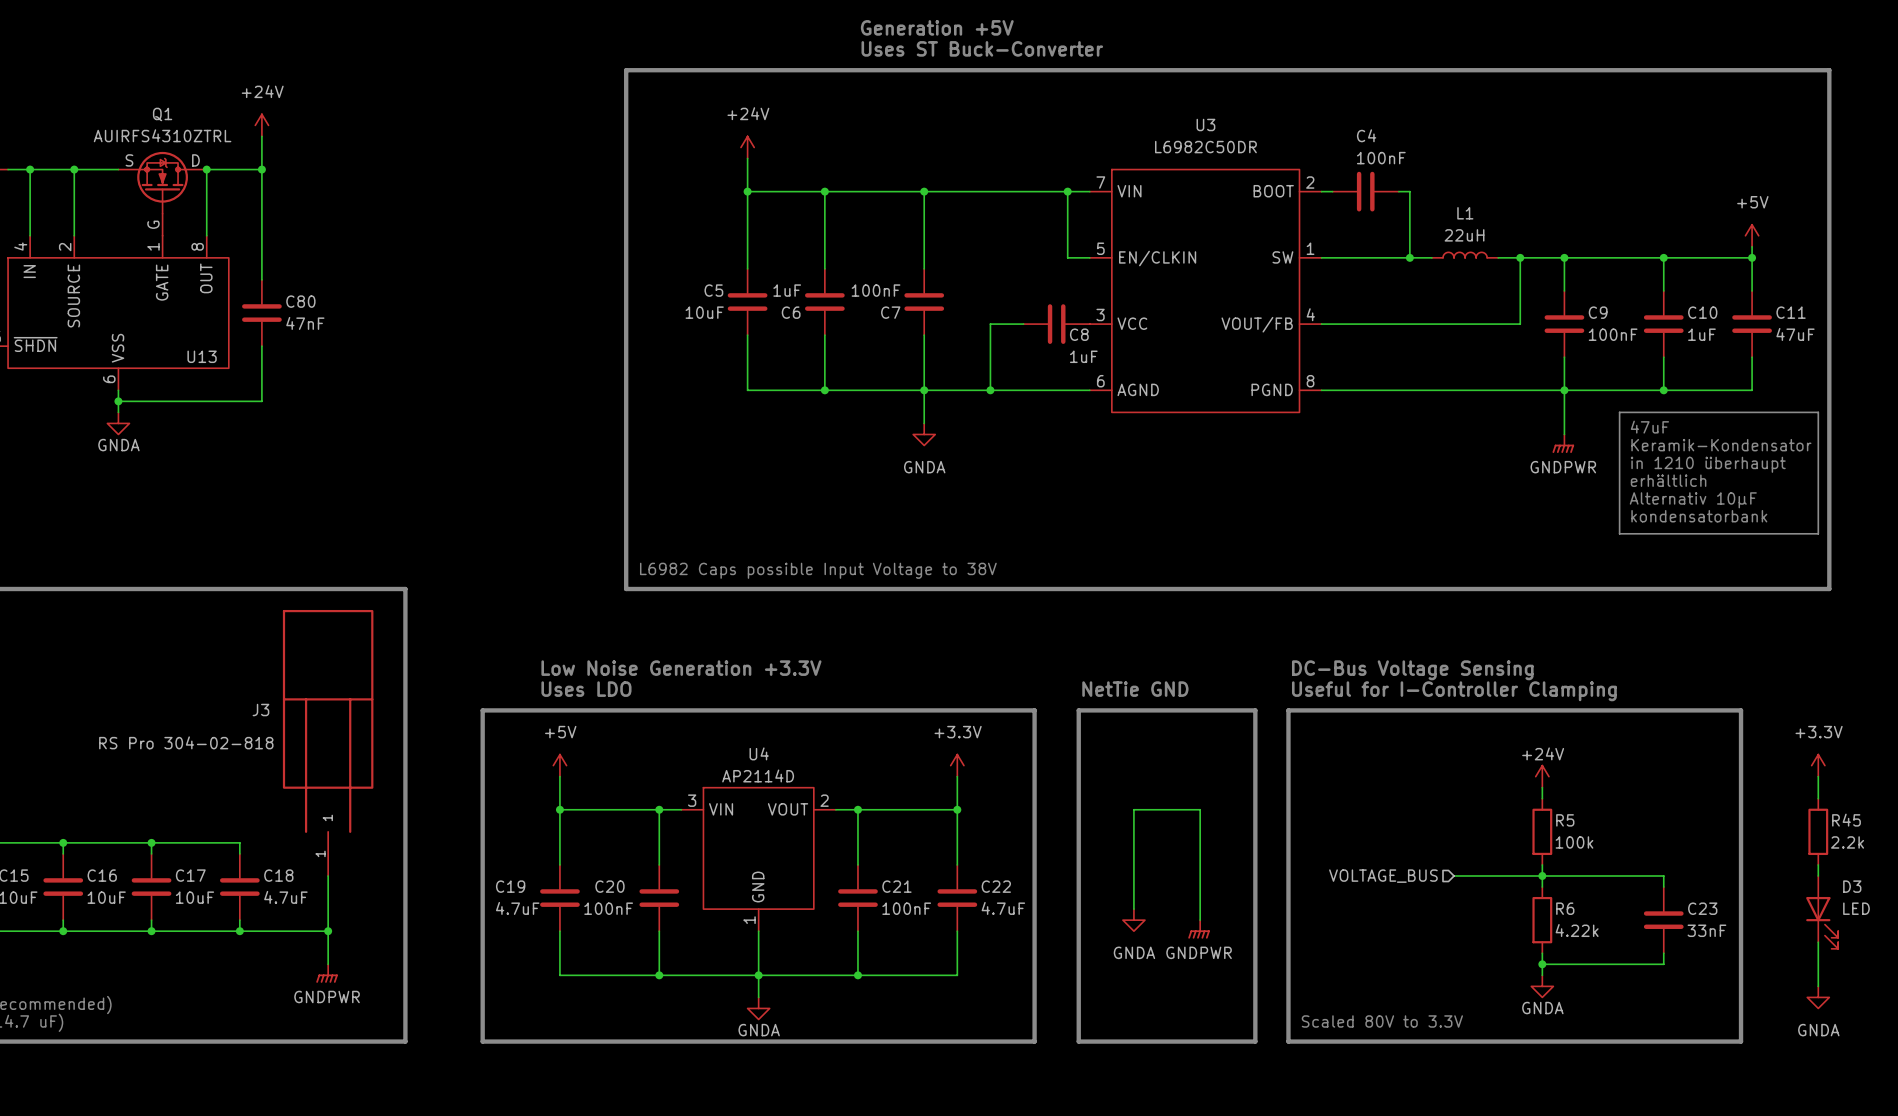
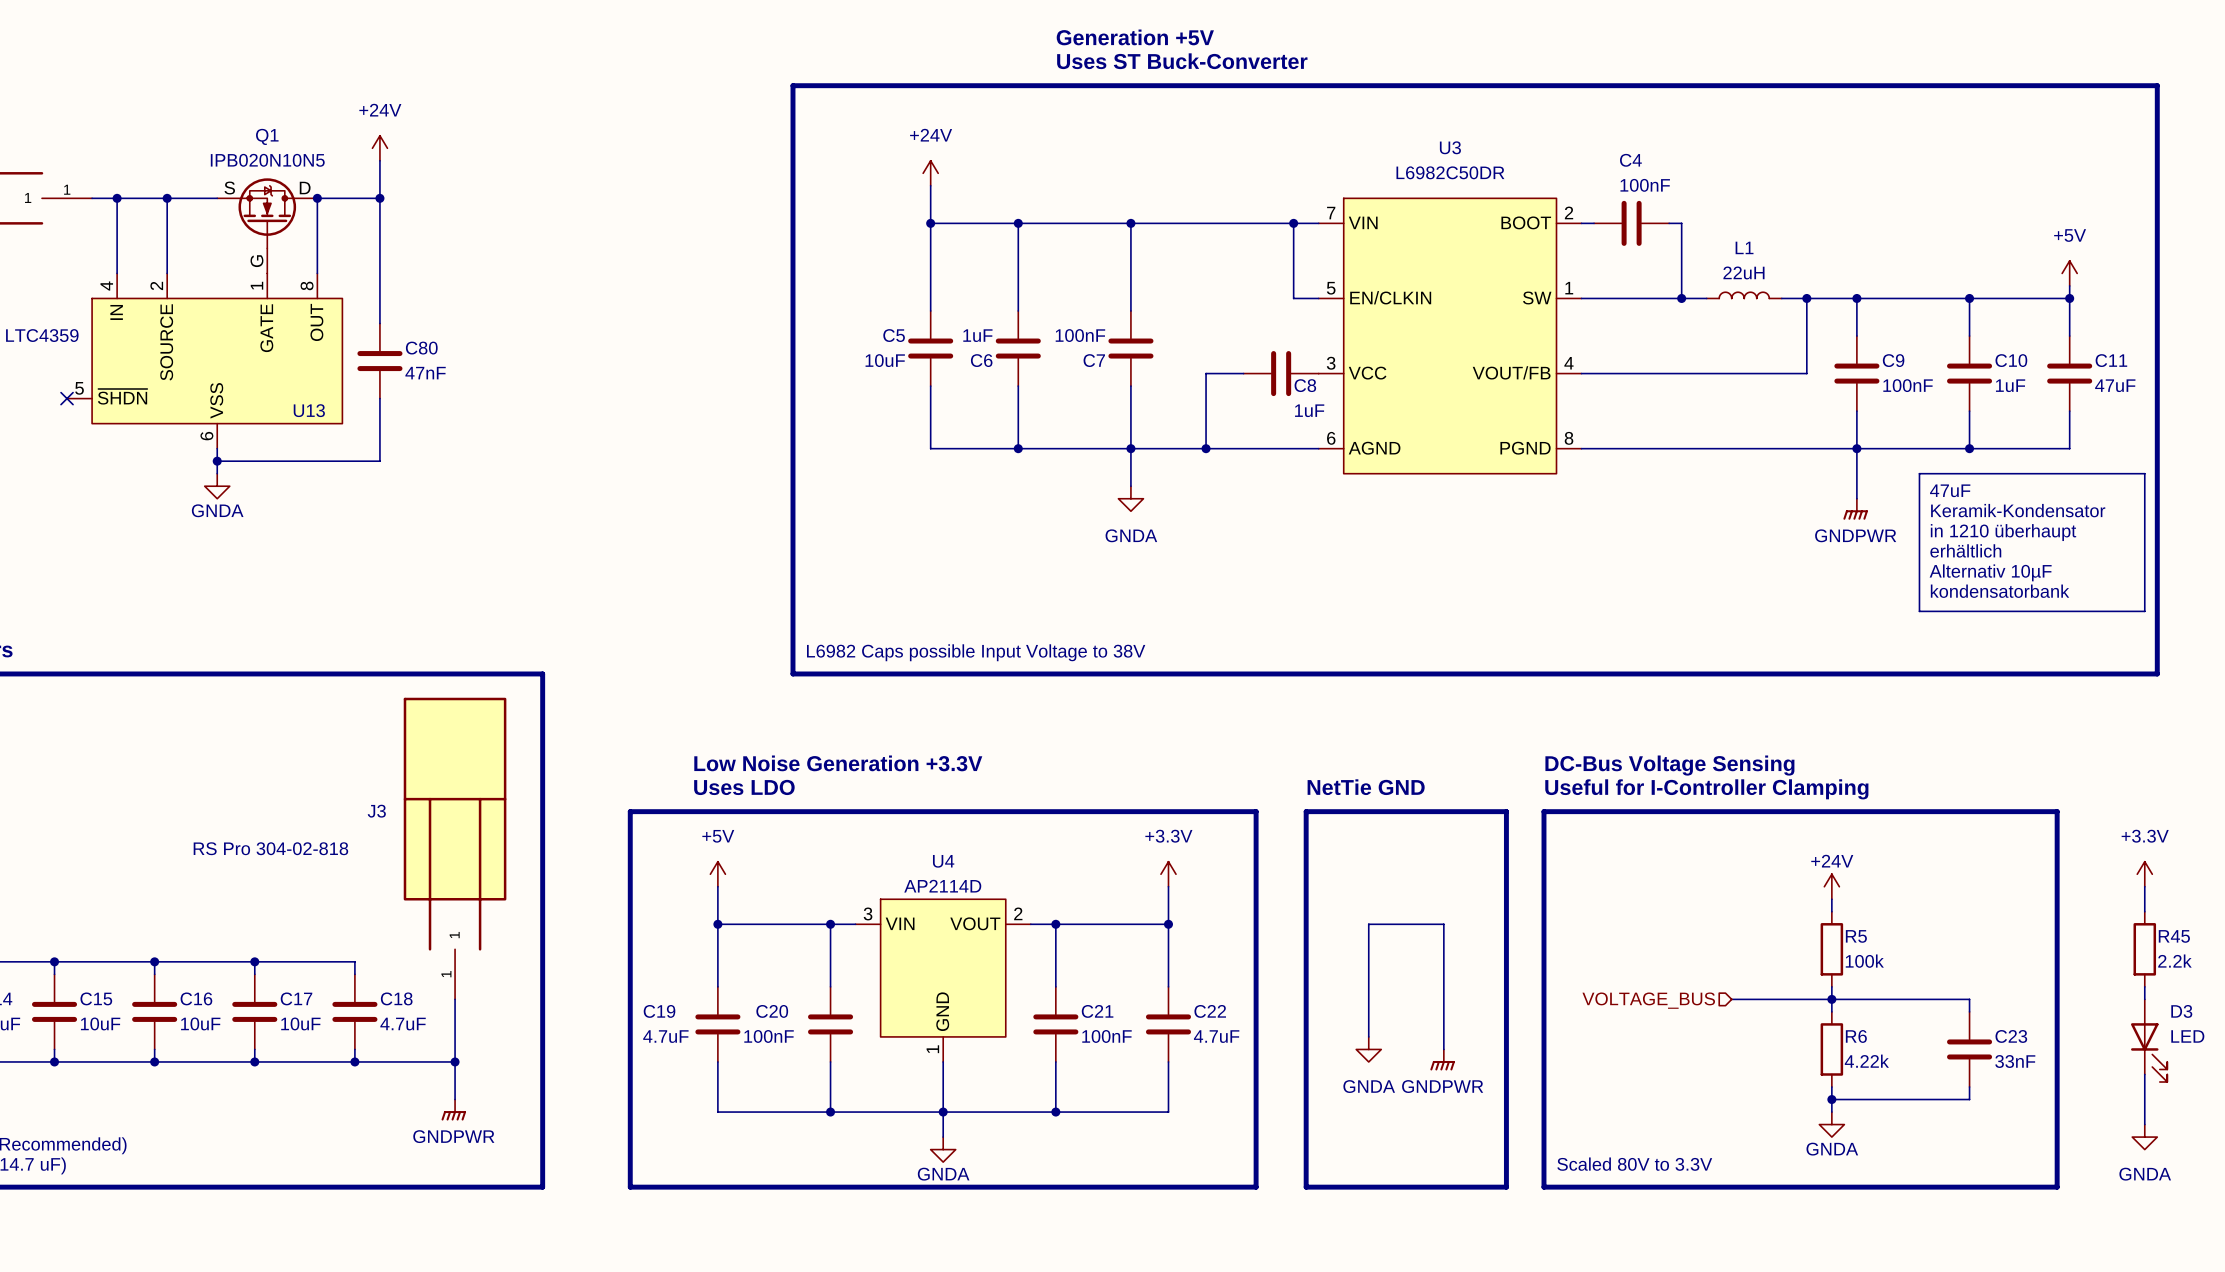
Q1 value: AUIRFS4310ZTRL (162, 135) -> IPB020N10N5 (267, 160)

